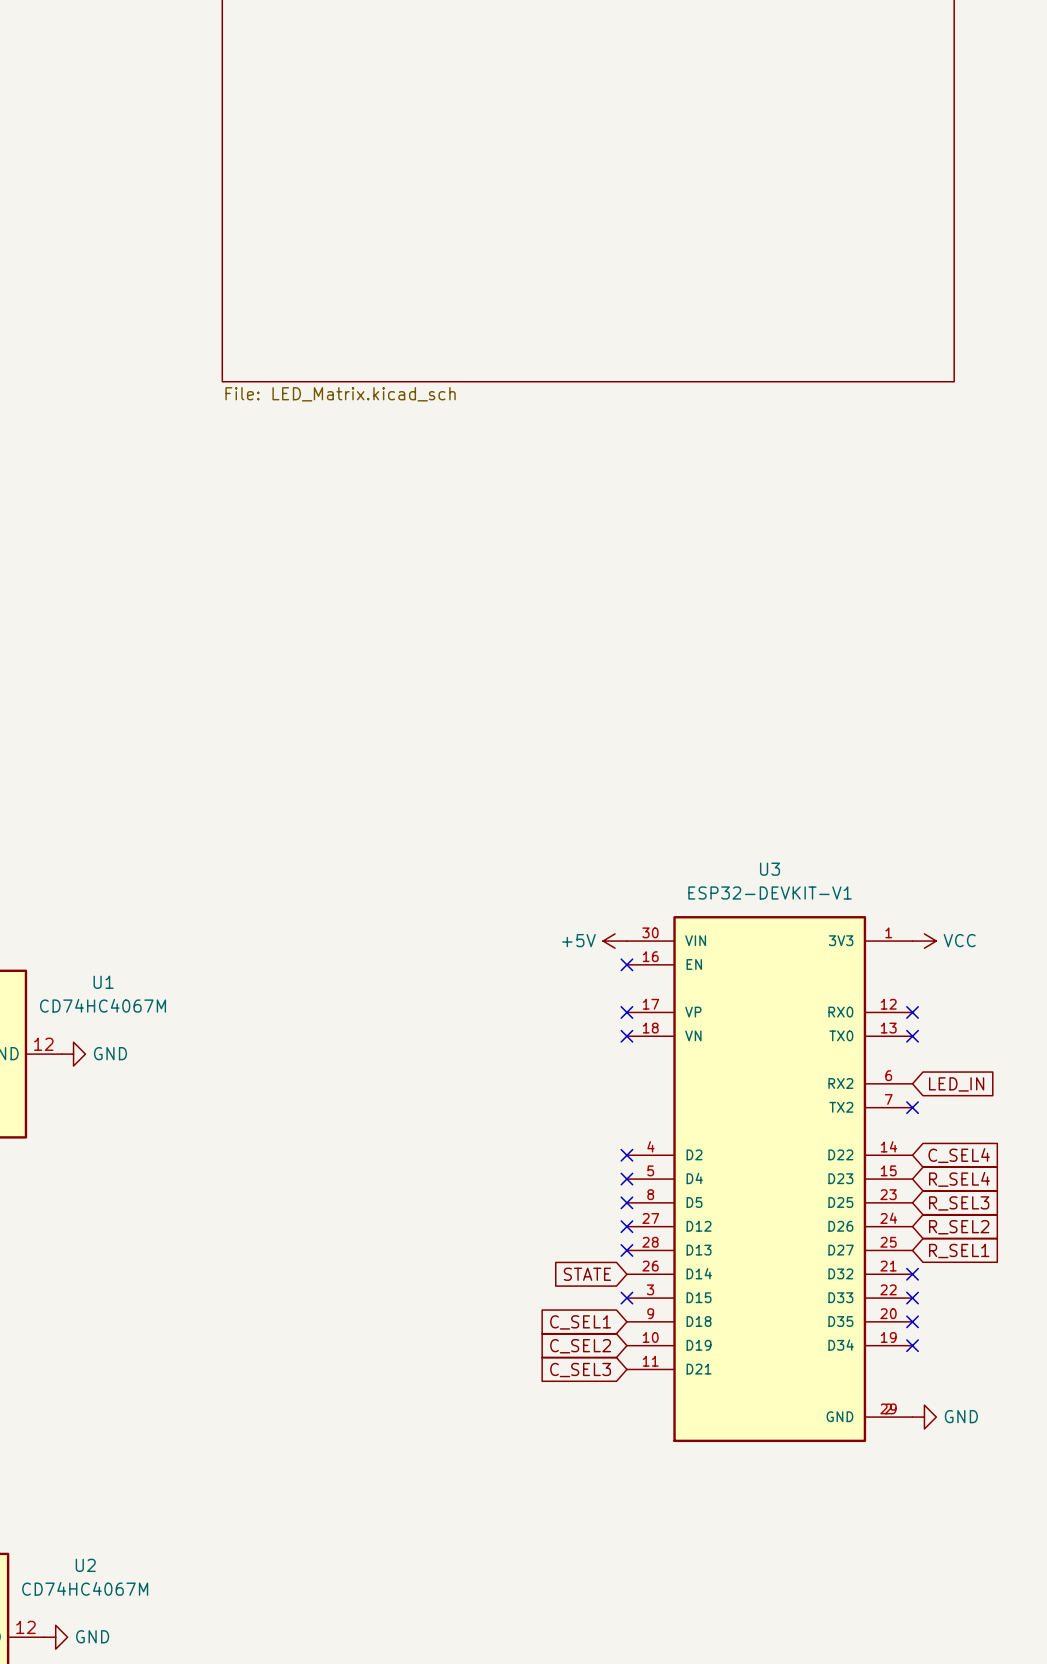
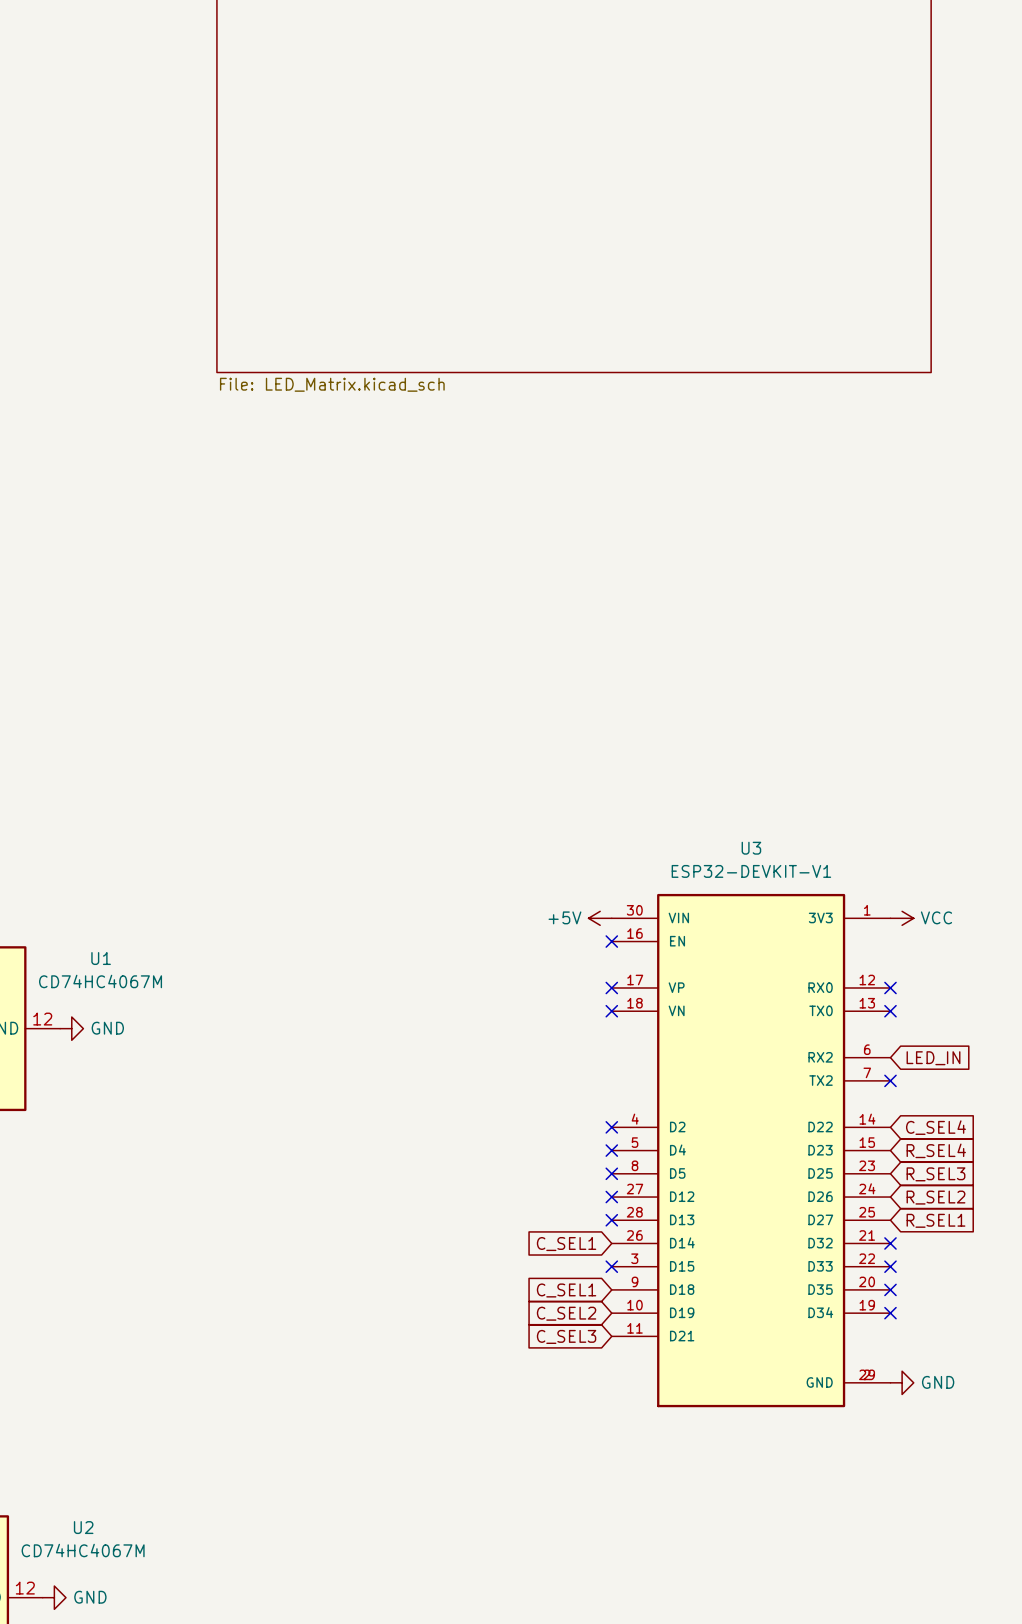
global label: STATE (587, 1274) -> C_SEL1 (566, 1244)

